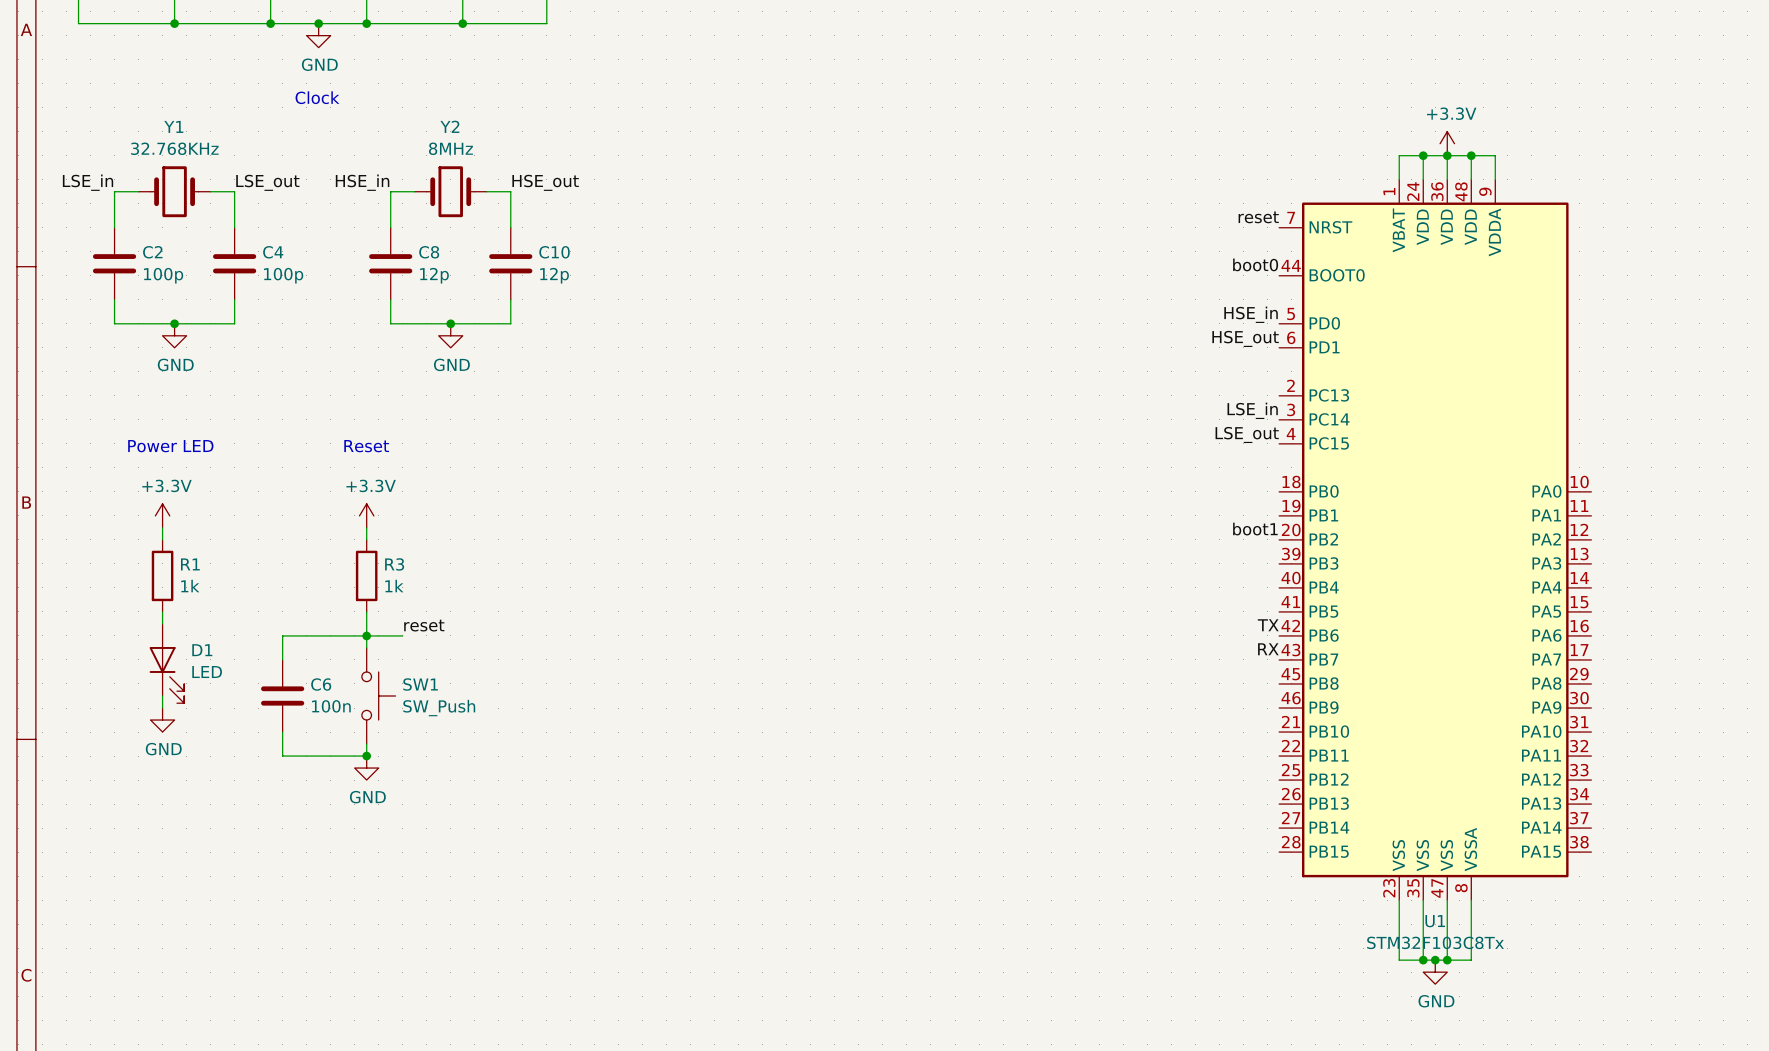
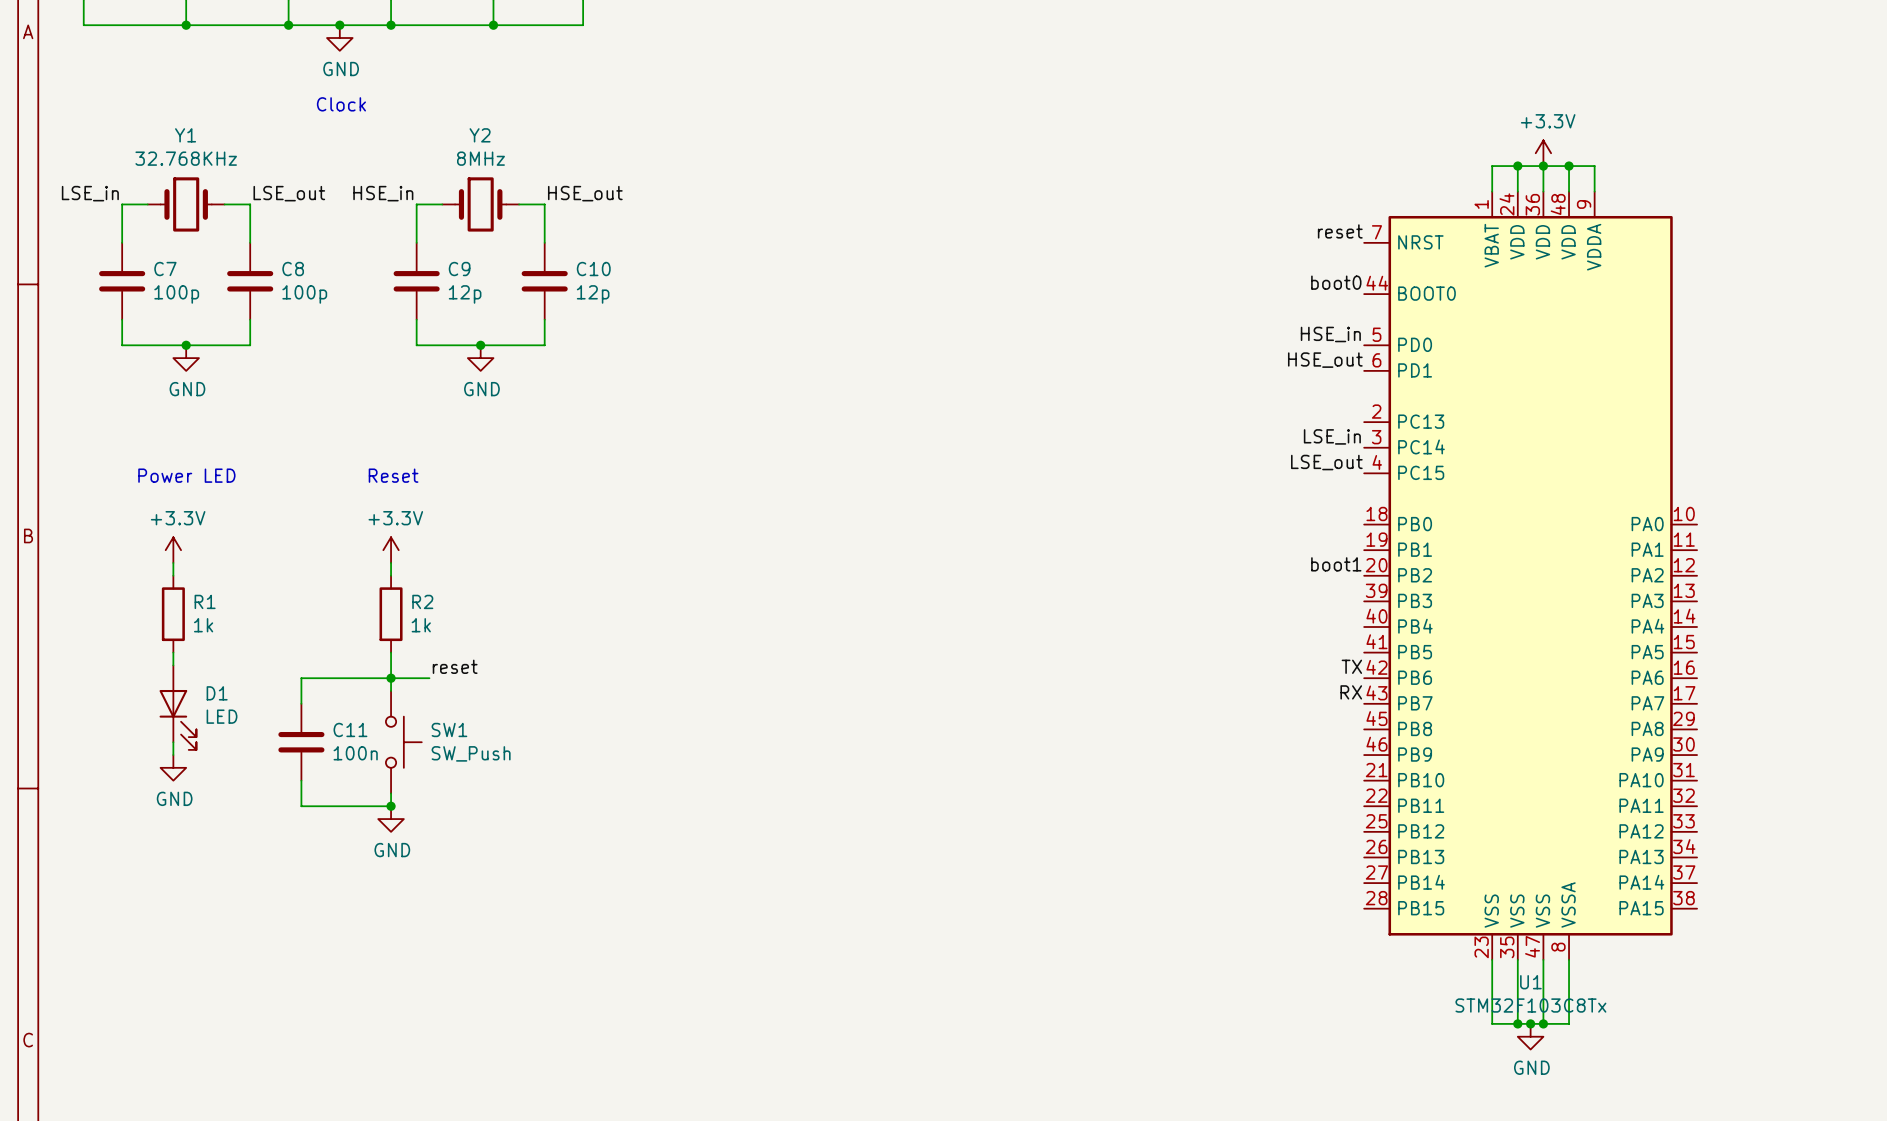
C2 name: C2 (152, 252) -> C7 (165, 269)
C4 name: C4 (273, 252) -> C8 (293, 269)
C8 name: C8 (429, 252) -> C9 (459, 269)
R3 name: R3 (394, 564) -> R2 (422, 601)
C6 name: C6 (321, 684) -> C11 (350, 729)

